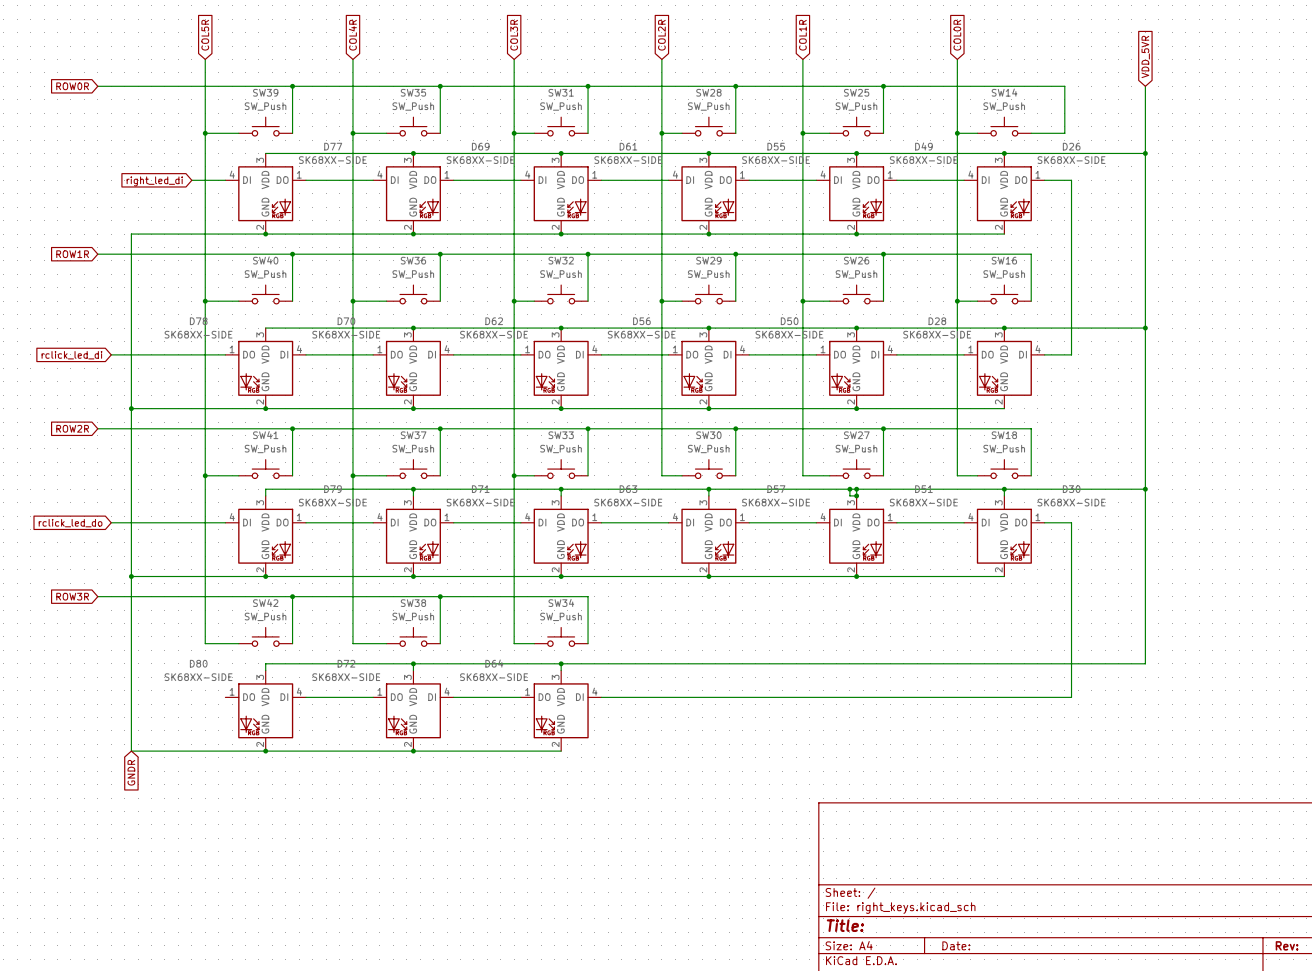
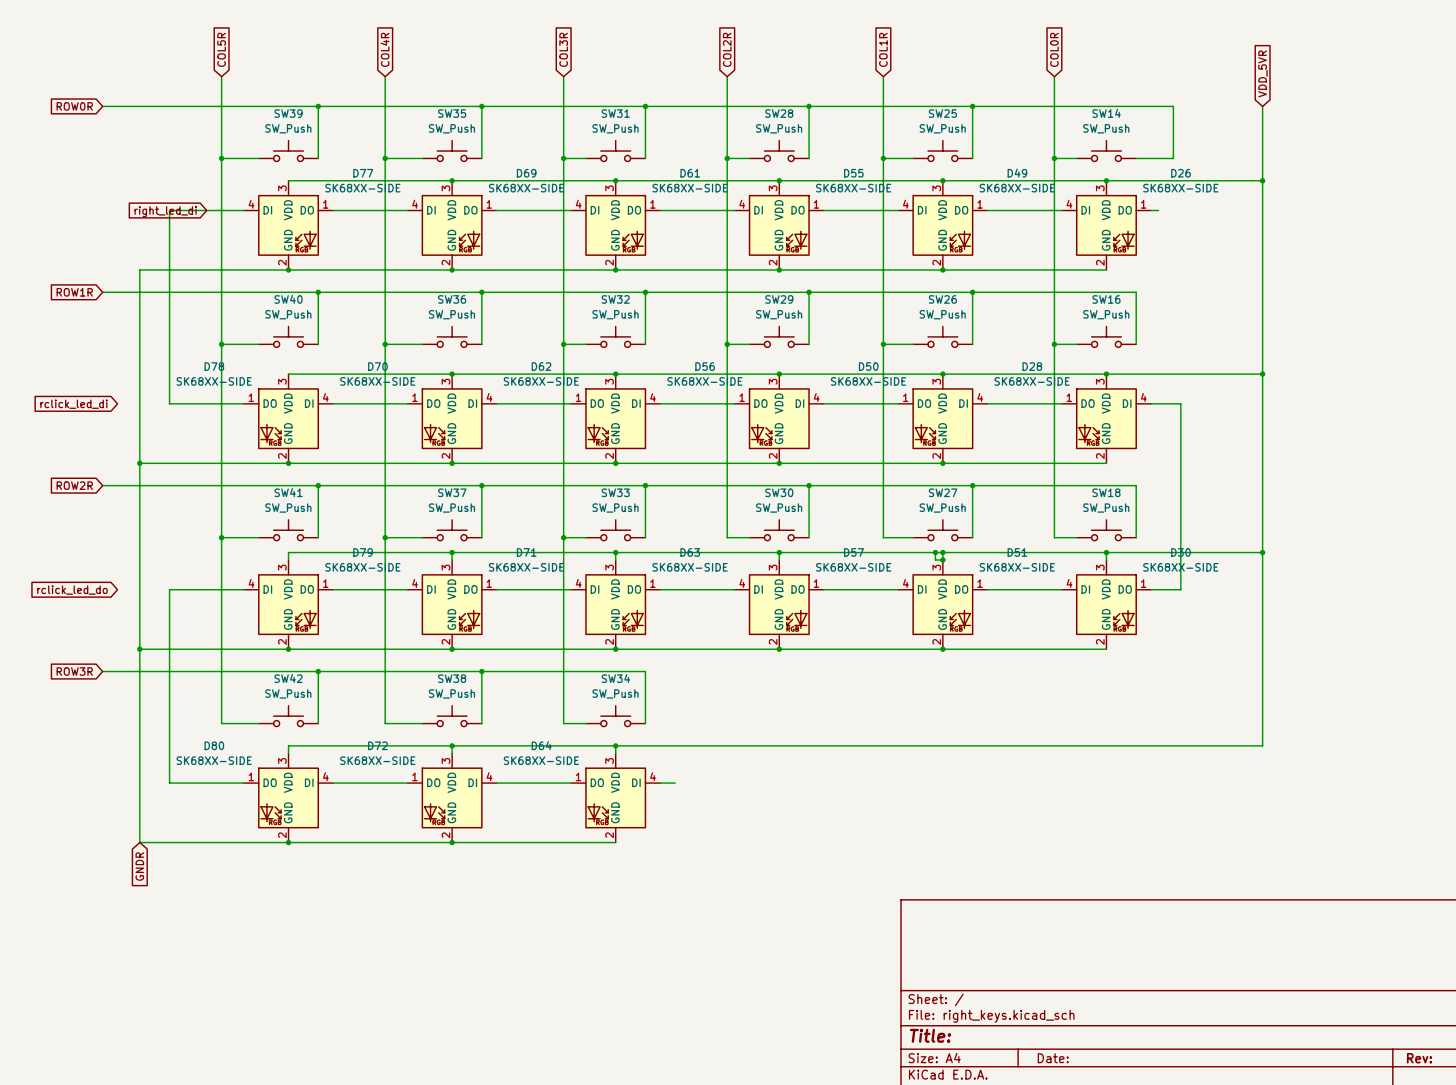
wire: (1051, 180) (1071, 180) (1071, 354) -> (1180, 589) (1180, 403)
wire: (111, 354) (158, 354) -> (206, 210) (169, 210) (169, 403)
wire: (111, 522) (158, 522) -> (243, 783) (169, 783) (169, 589)
wire: (1071, 522) (1071, 697) (614, 697) -> none

